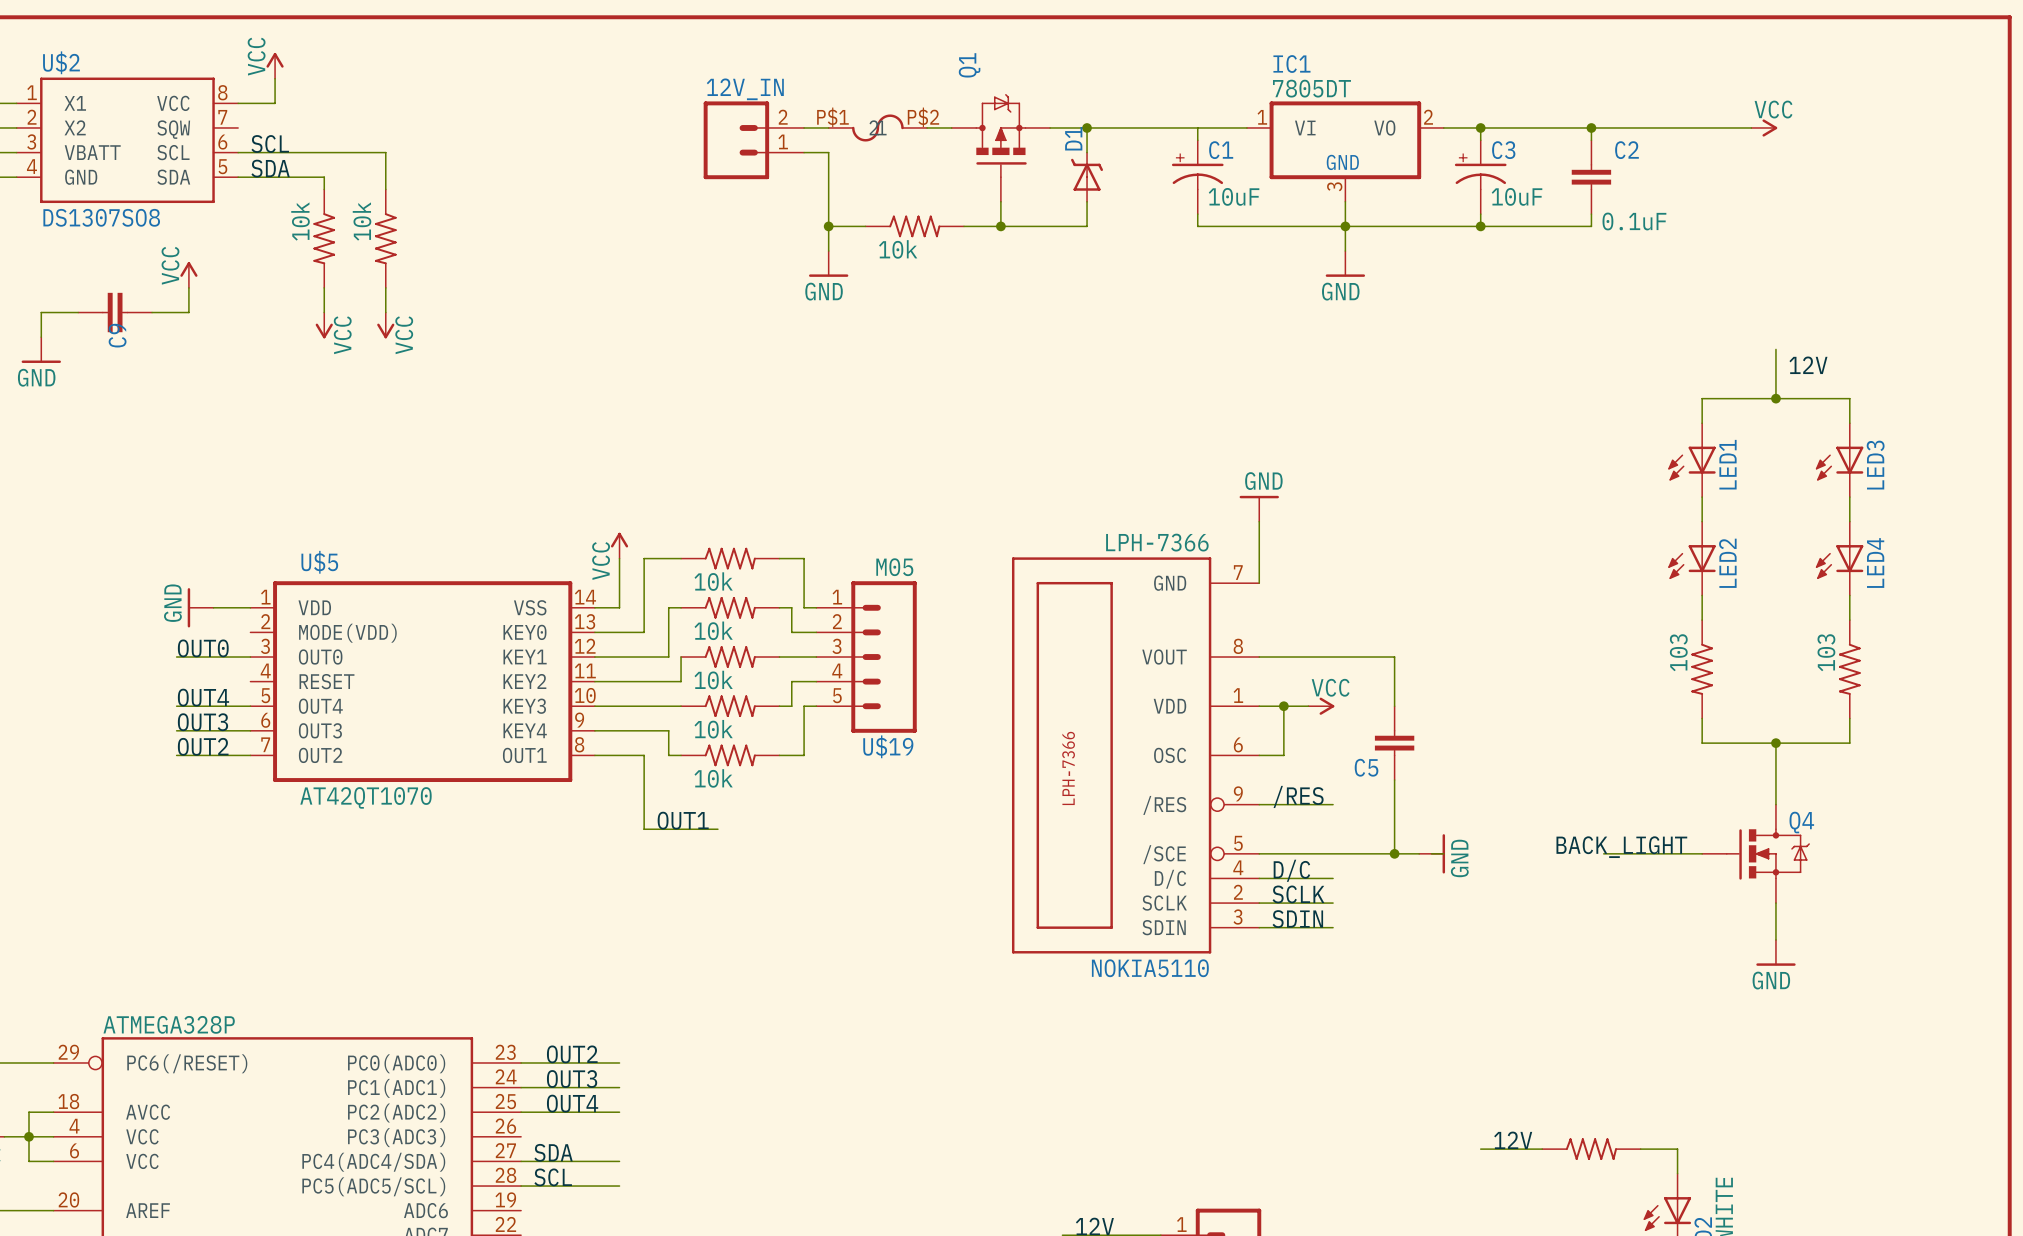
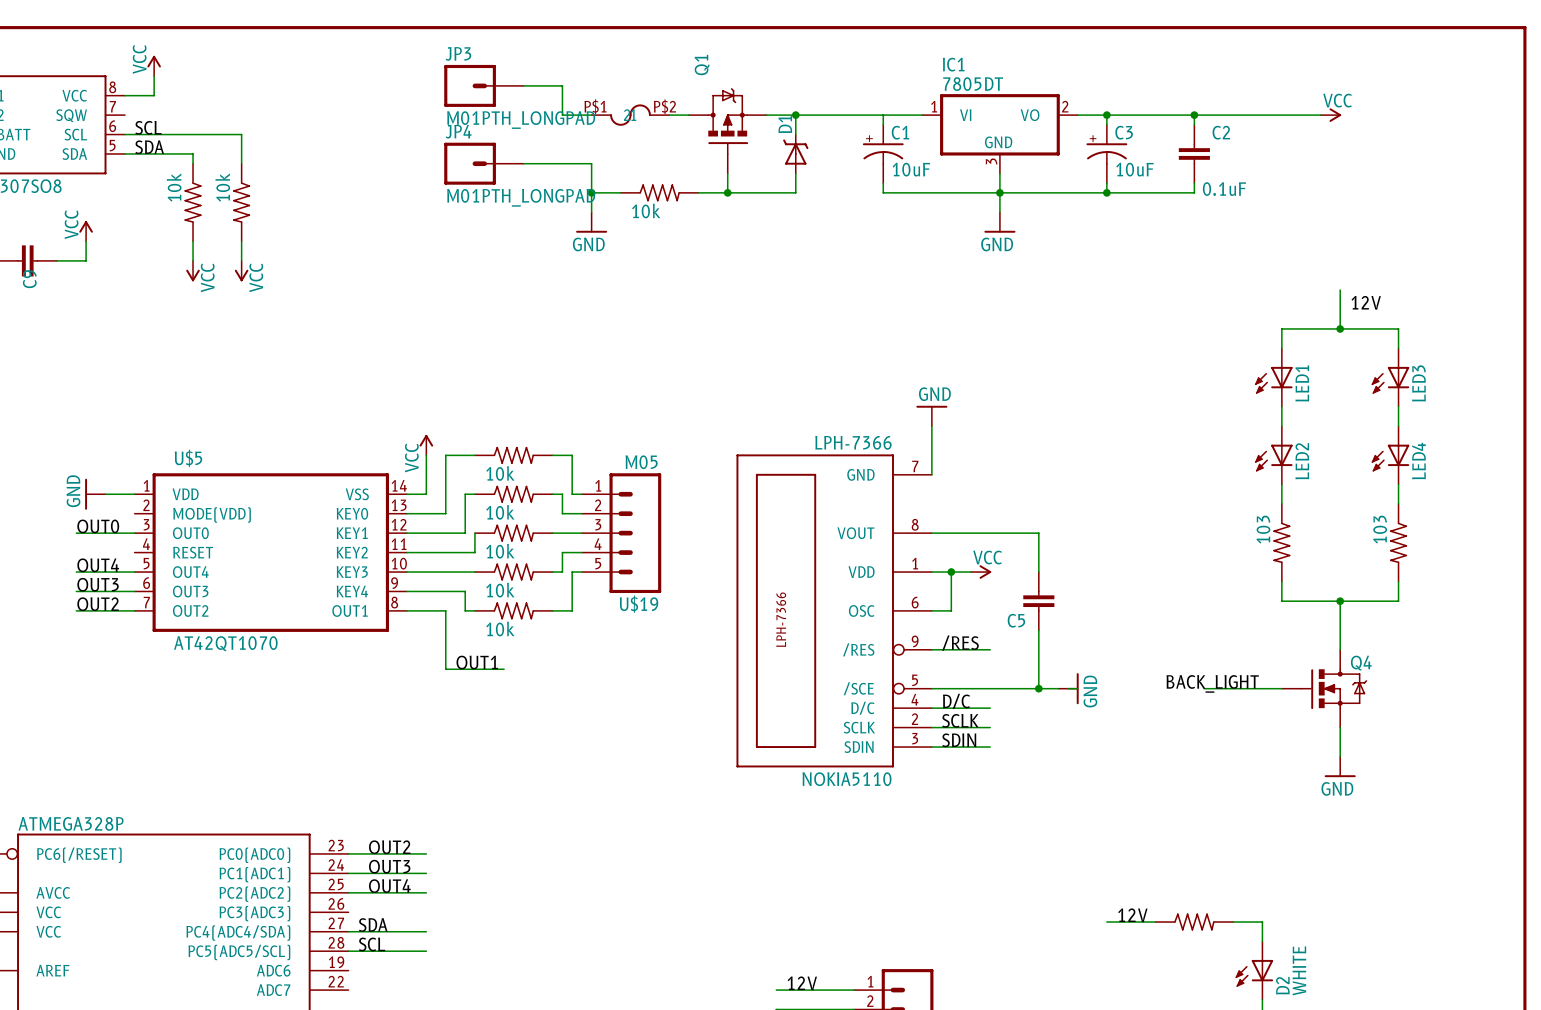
JP3: none -> M01PTH_LONGPAD (483, 85)
wire: none -> (523, 85) (562, 85) (562, 115) (572, 115)
12V_IN: (753, 140) -> none
wire: (804, 152) (828, 152) (828, 189) -> (523, 163) (591, 163)
JP4: none -> M01PTH_LONGPAD (483, 163)

